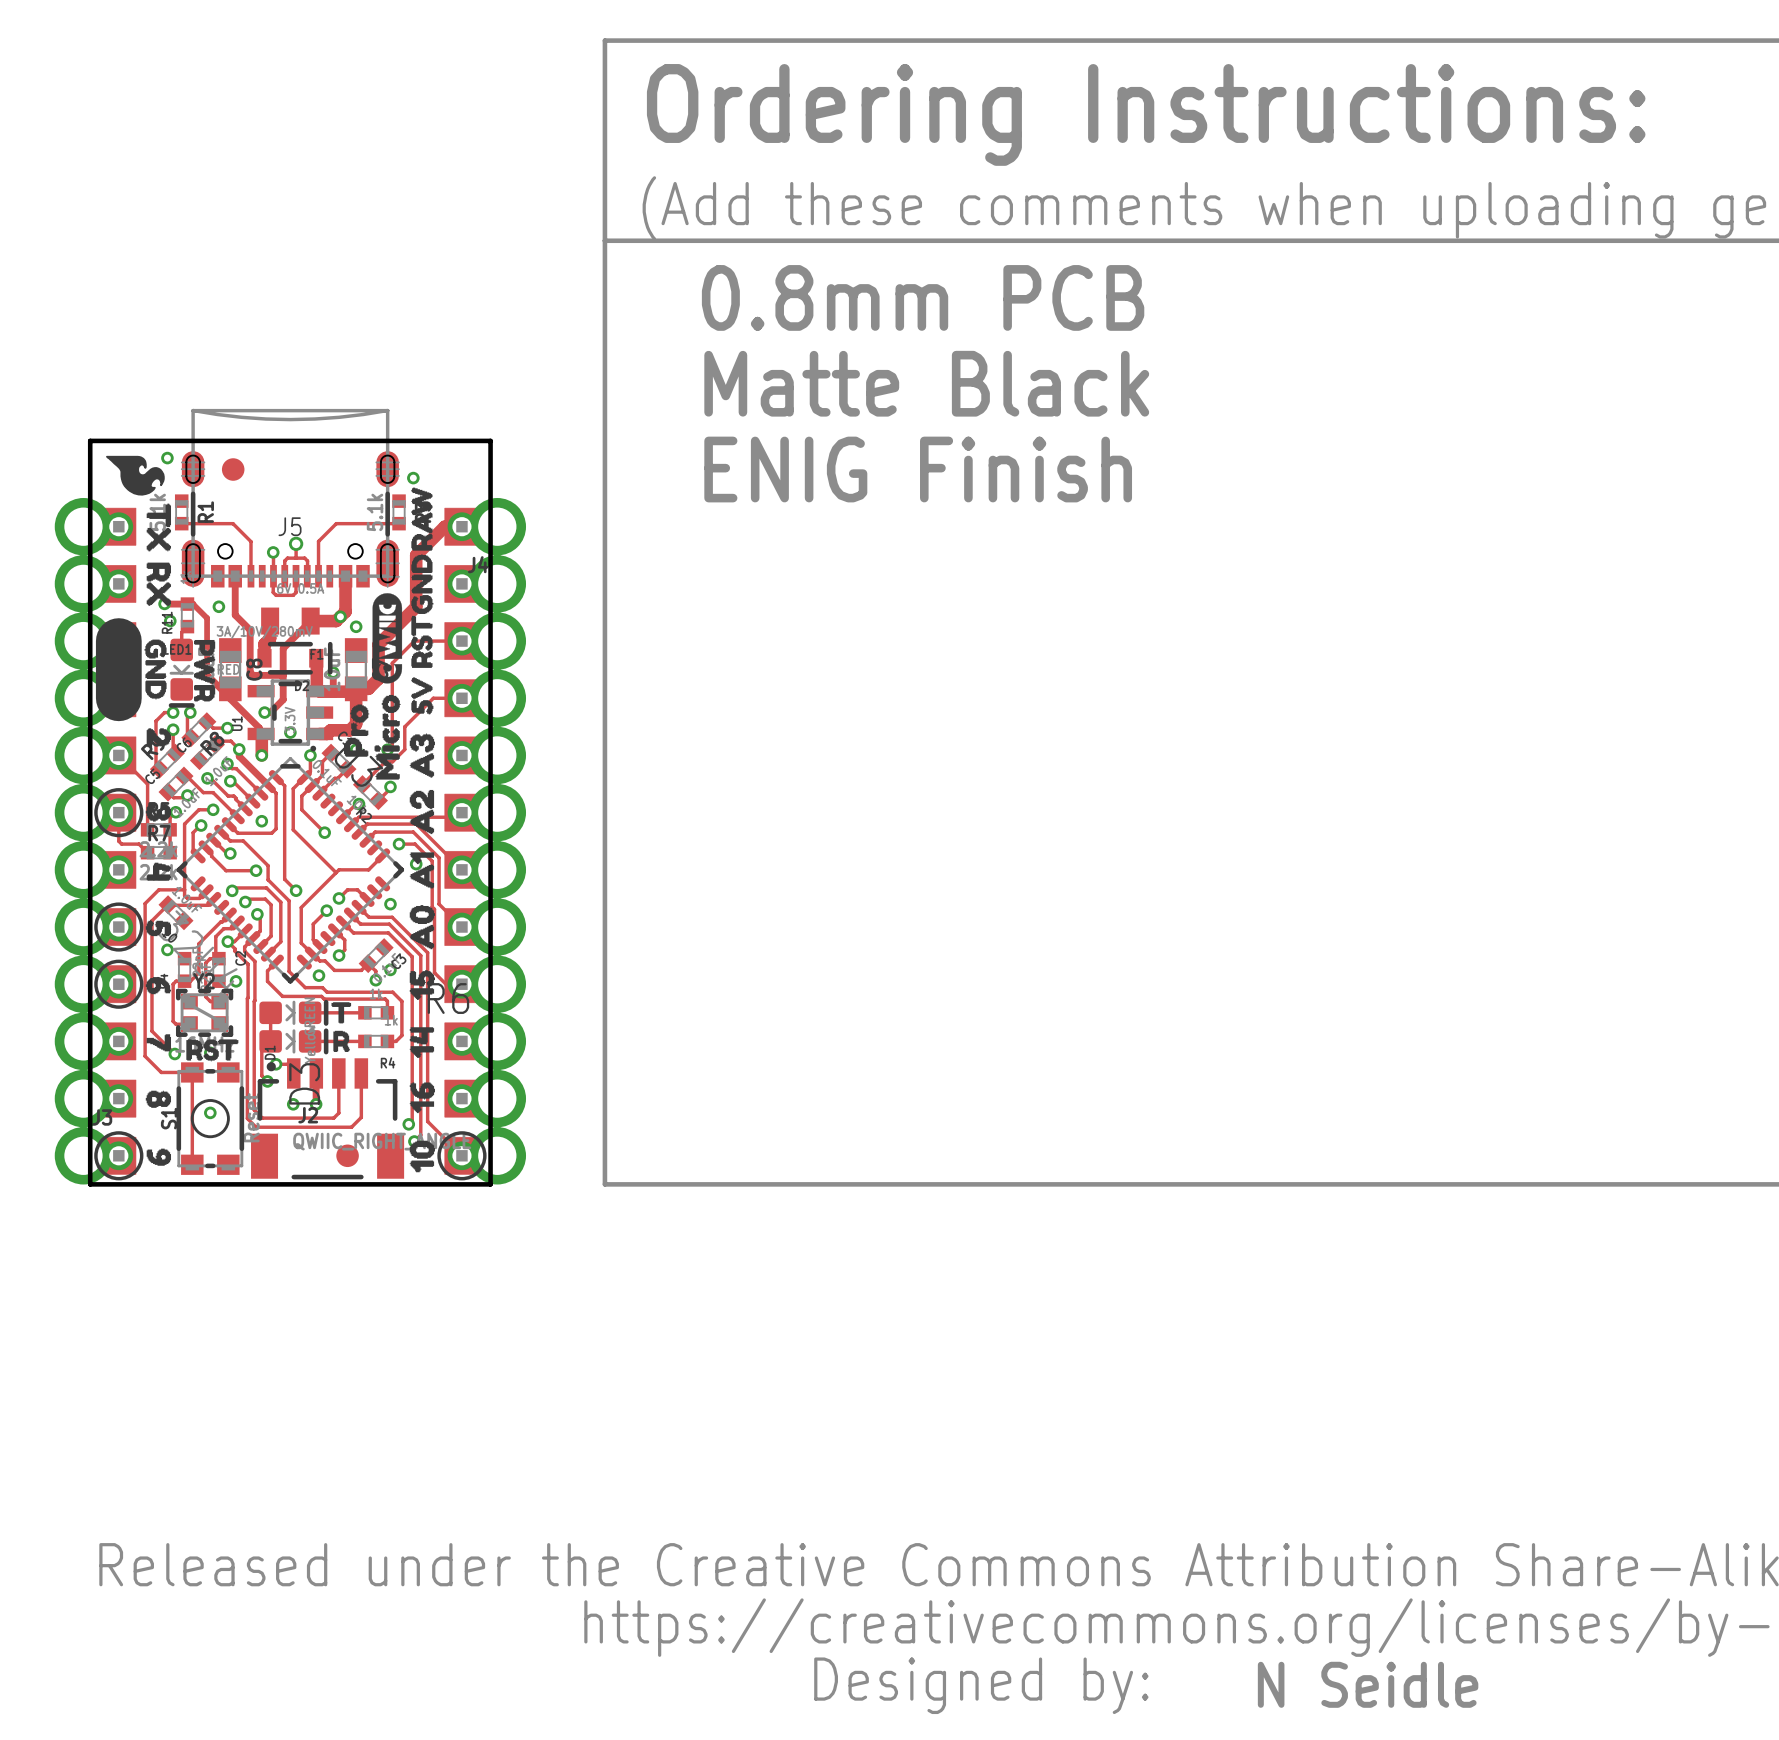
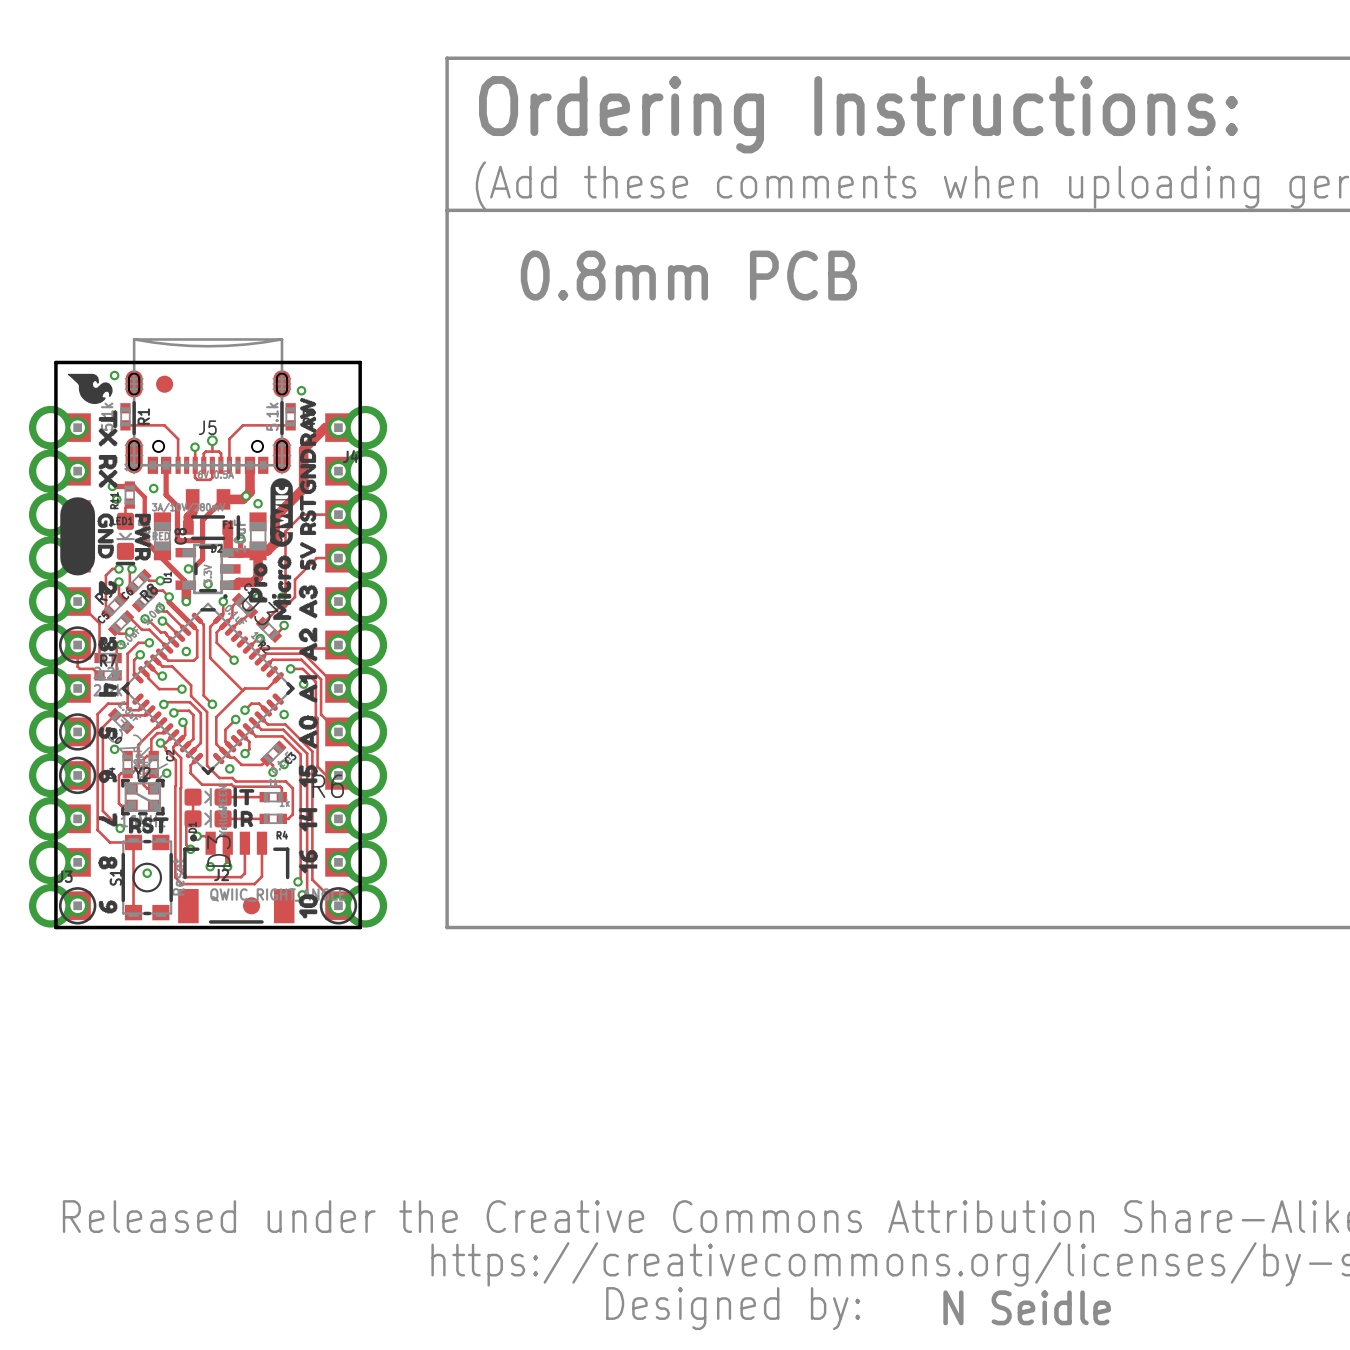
text position: 0.8mm PCB (923, 297) -> 0.8mm PCB (688, 275)
text: Matte Black (926, 383) -> none
text: ENIG Finish (918, 469) -> none

